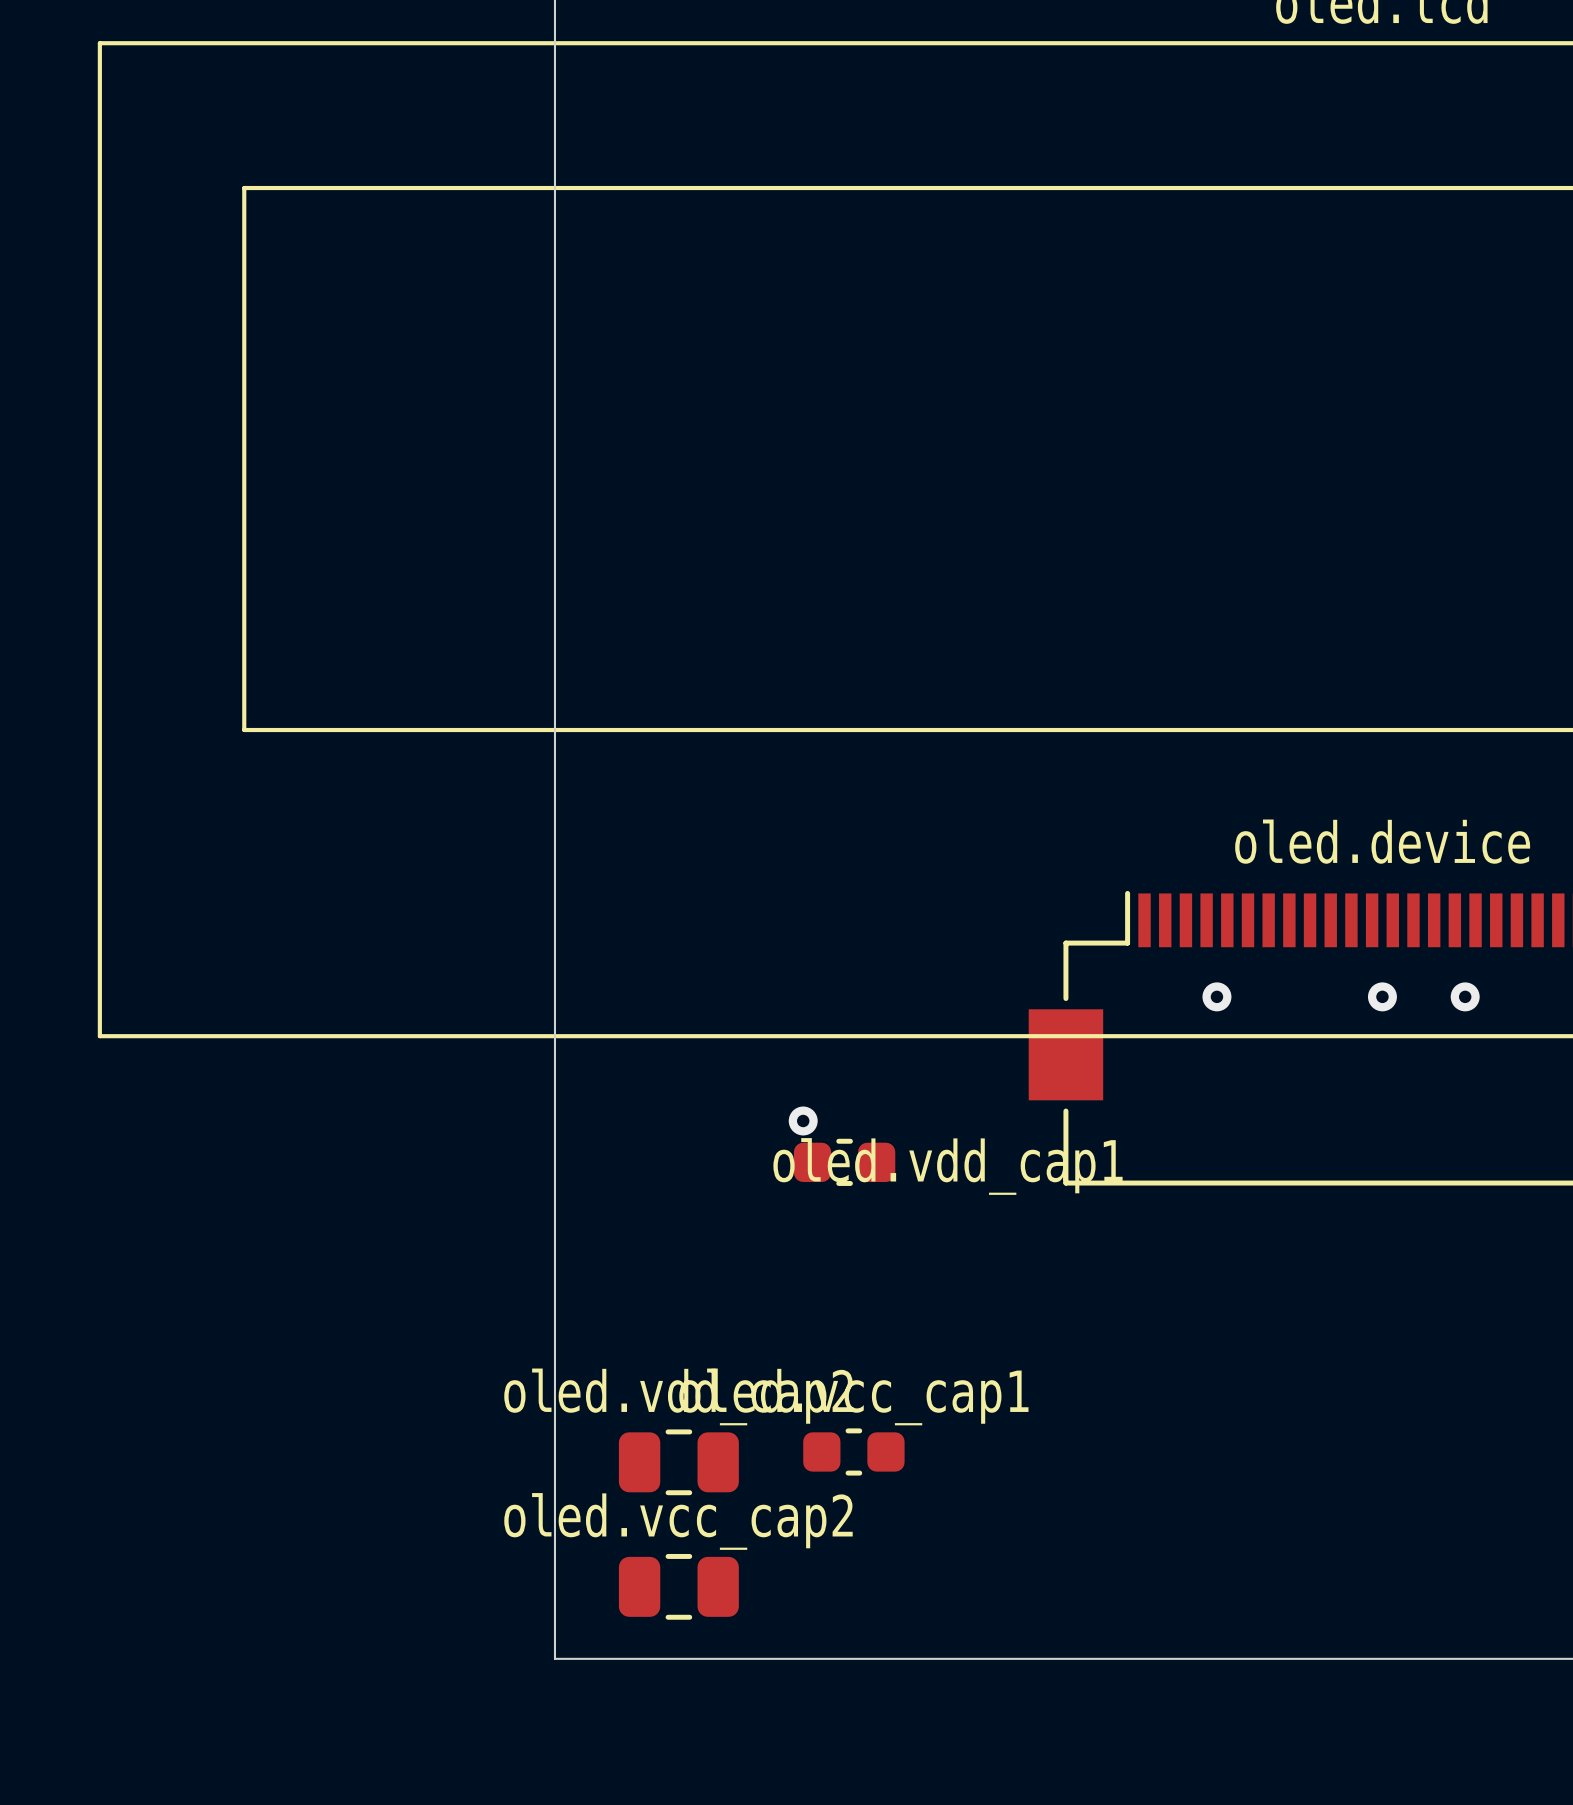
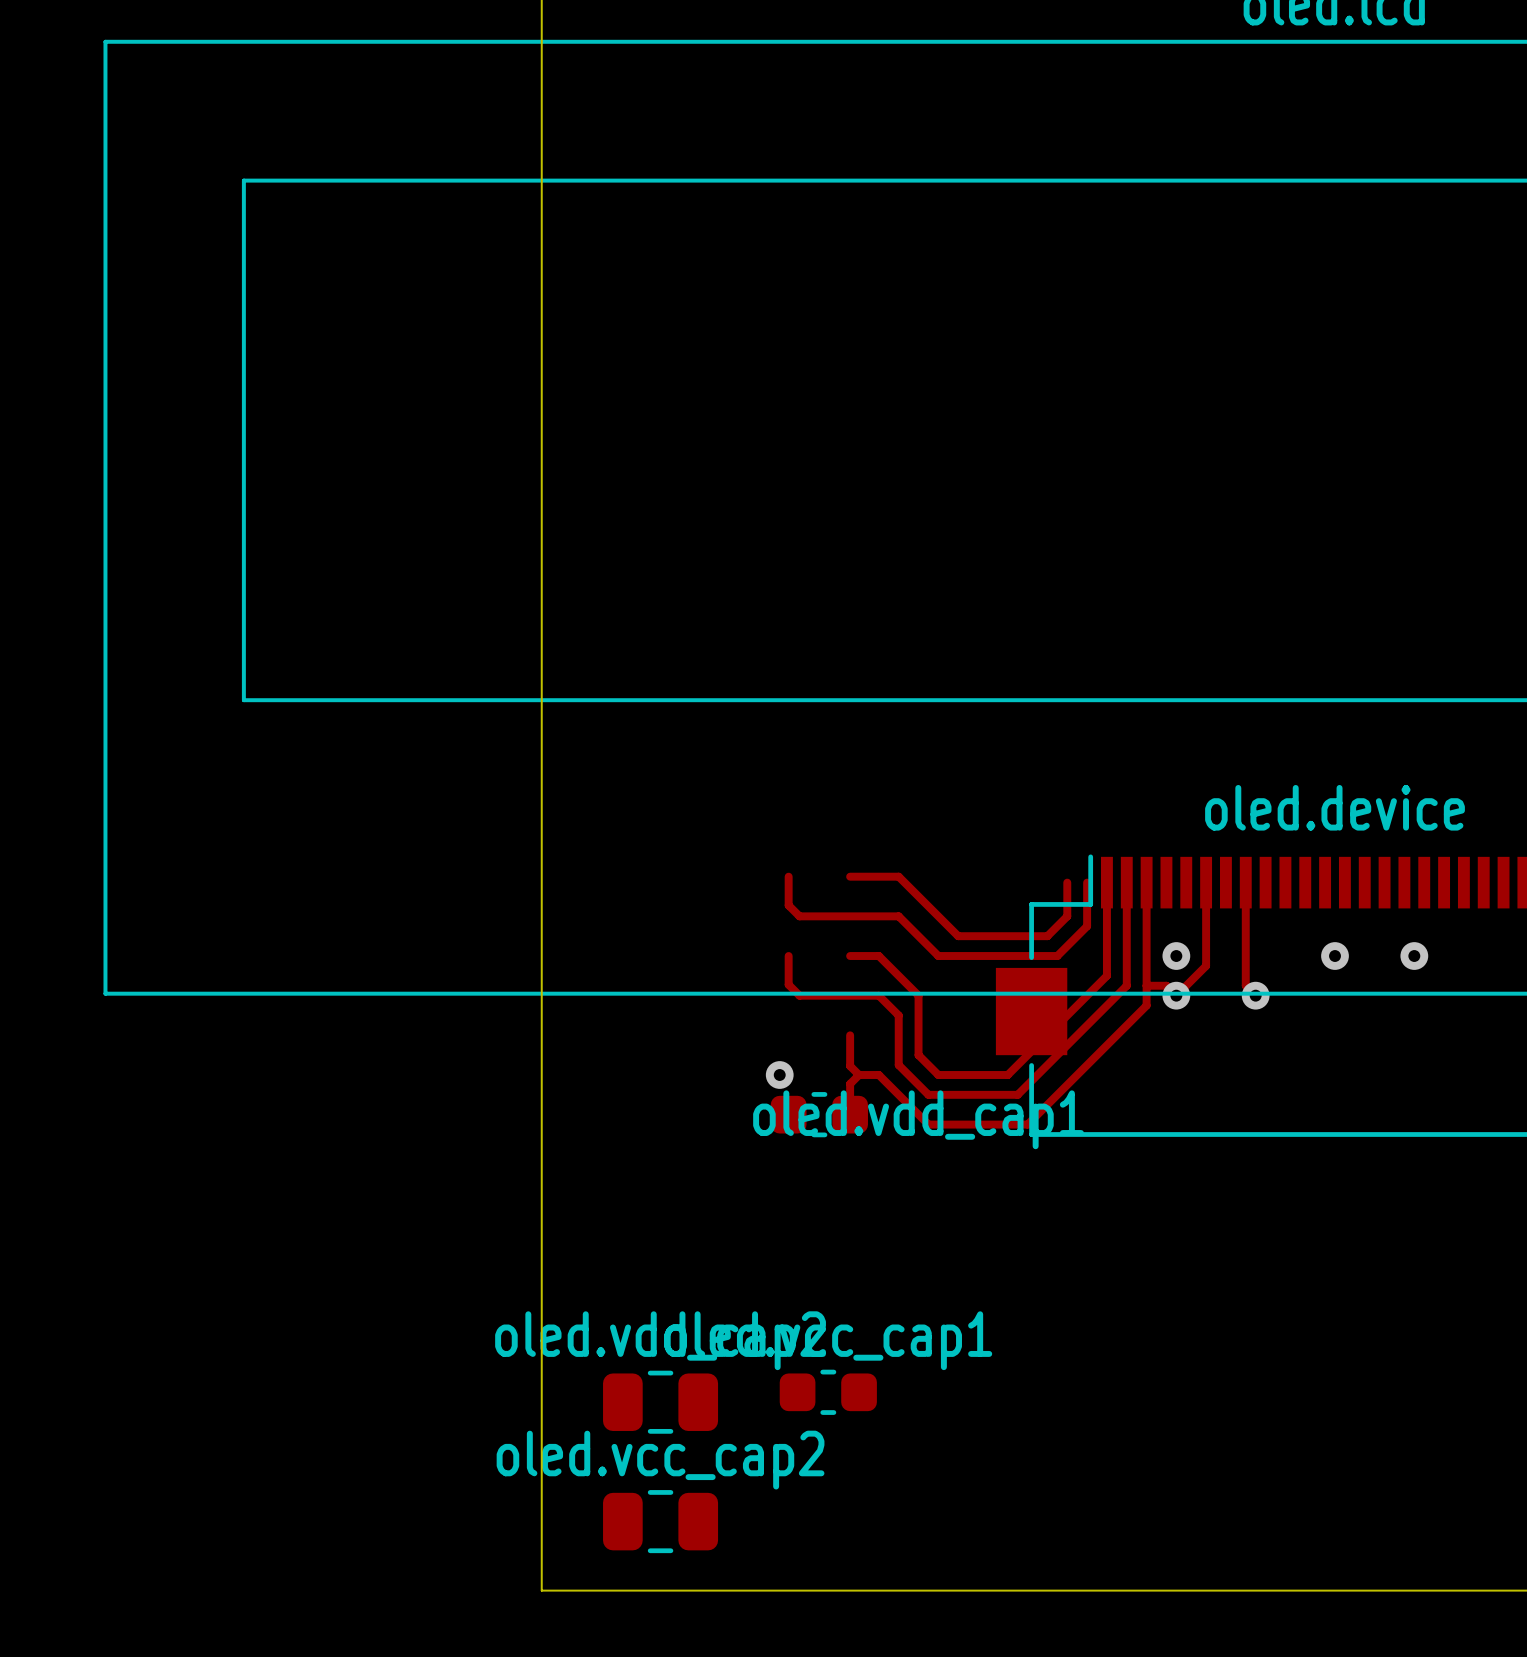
top track: none -> (788, 876) (788, 905) (799, 916) (898, 916) (938, 956) (1057, 956) (1087, 926) (1087, 882)
top track: none -> (850, 876) (898, 876) (958, 936) (1047, 936) (1067, 916) (1067, 882)
top track: none -> (1106, 882) (1106, 975) (1007, 1075) (938, 1075) (918, 1055) (918, 995) (878, 956) (850, 956)
top track: none -> (1126, 882) (1126, 985) (1017, 1094) (928, 1094) (898, 1065) (898, 1015) (878, 995) (799, 995) (788, 984) (788, 956)
top track: none -> (1146, 882) (1146, 1005) (1027, 1124) (928, 1124) (878, 1075) (859, 1075)
top track: none -> (1206, 882) (1206, 965) (1176, 995) (1166, 985) (1146, 985)
top track: none -> (1245, 882) (1245, 985) (1255, 995)
via: none -> (1176, 995)
via: none -> (1255, 995)
top track: none -> (850, 1035) (850, 1066) (859, 1075)
top track: none -> (859, 1075) (850, 1083) (850, 1114)

